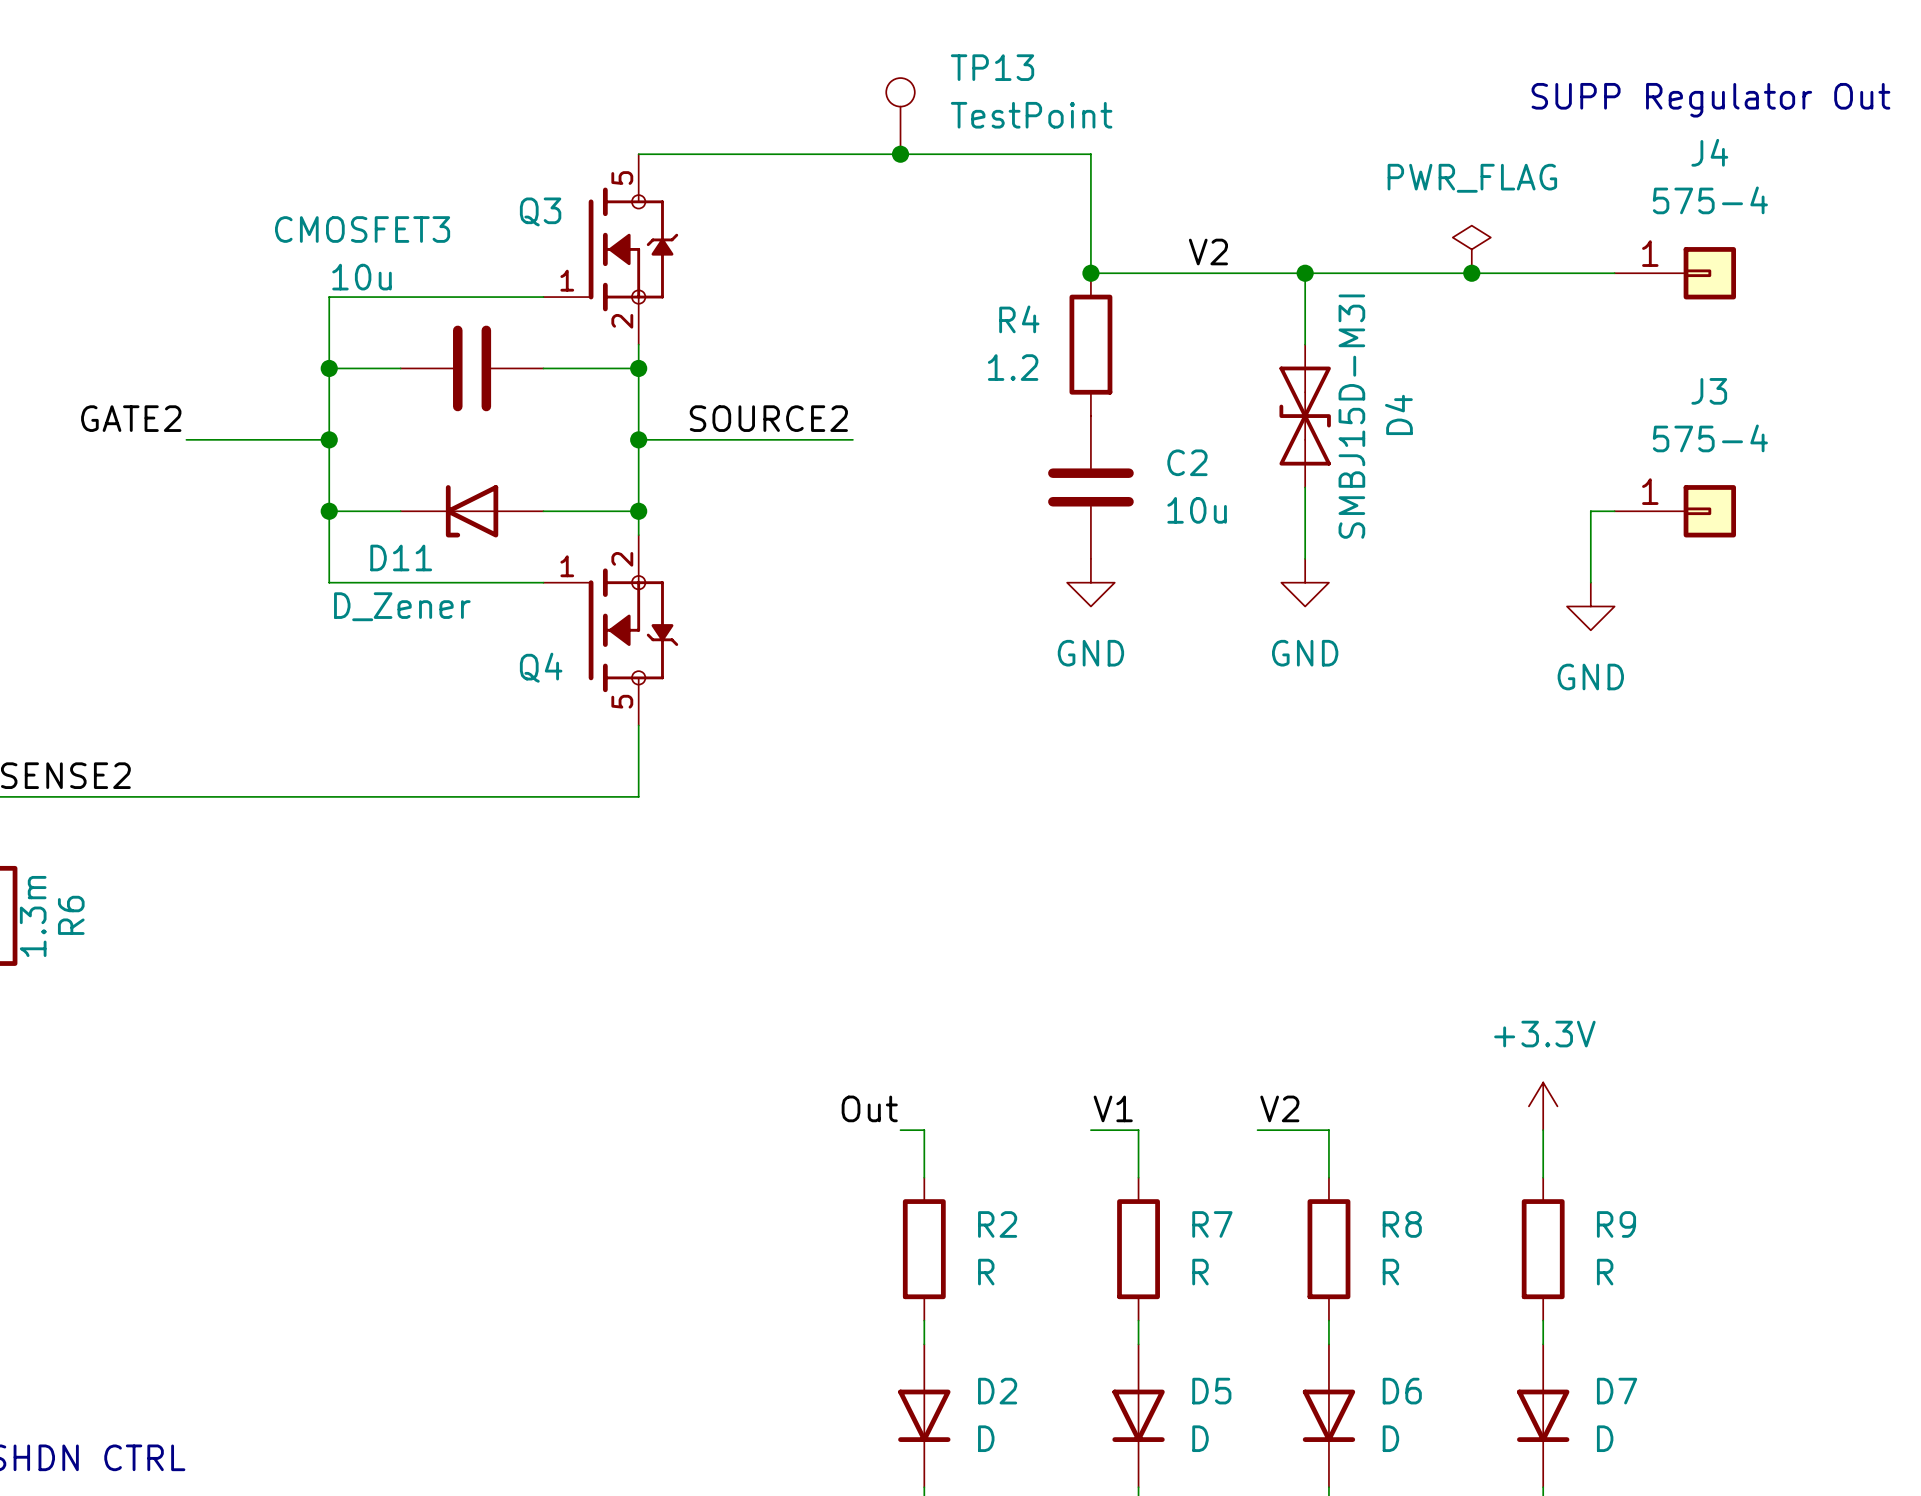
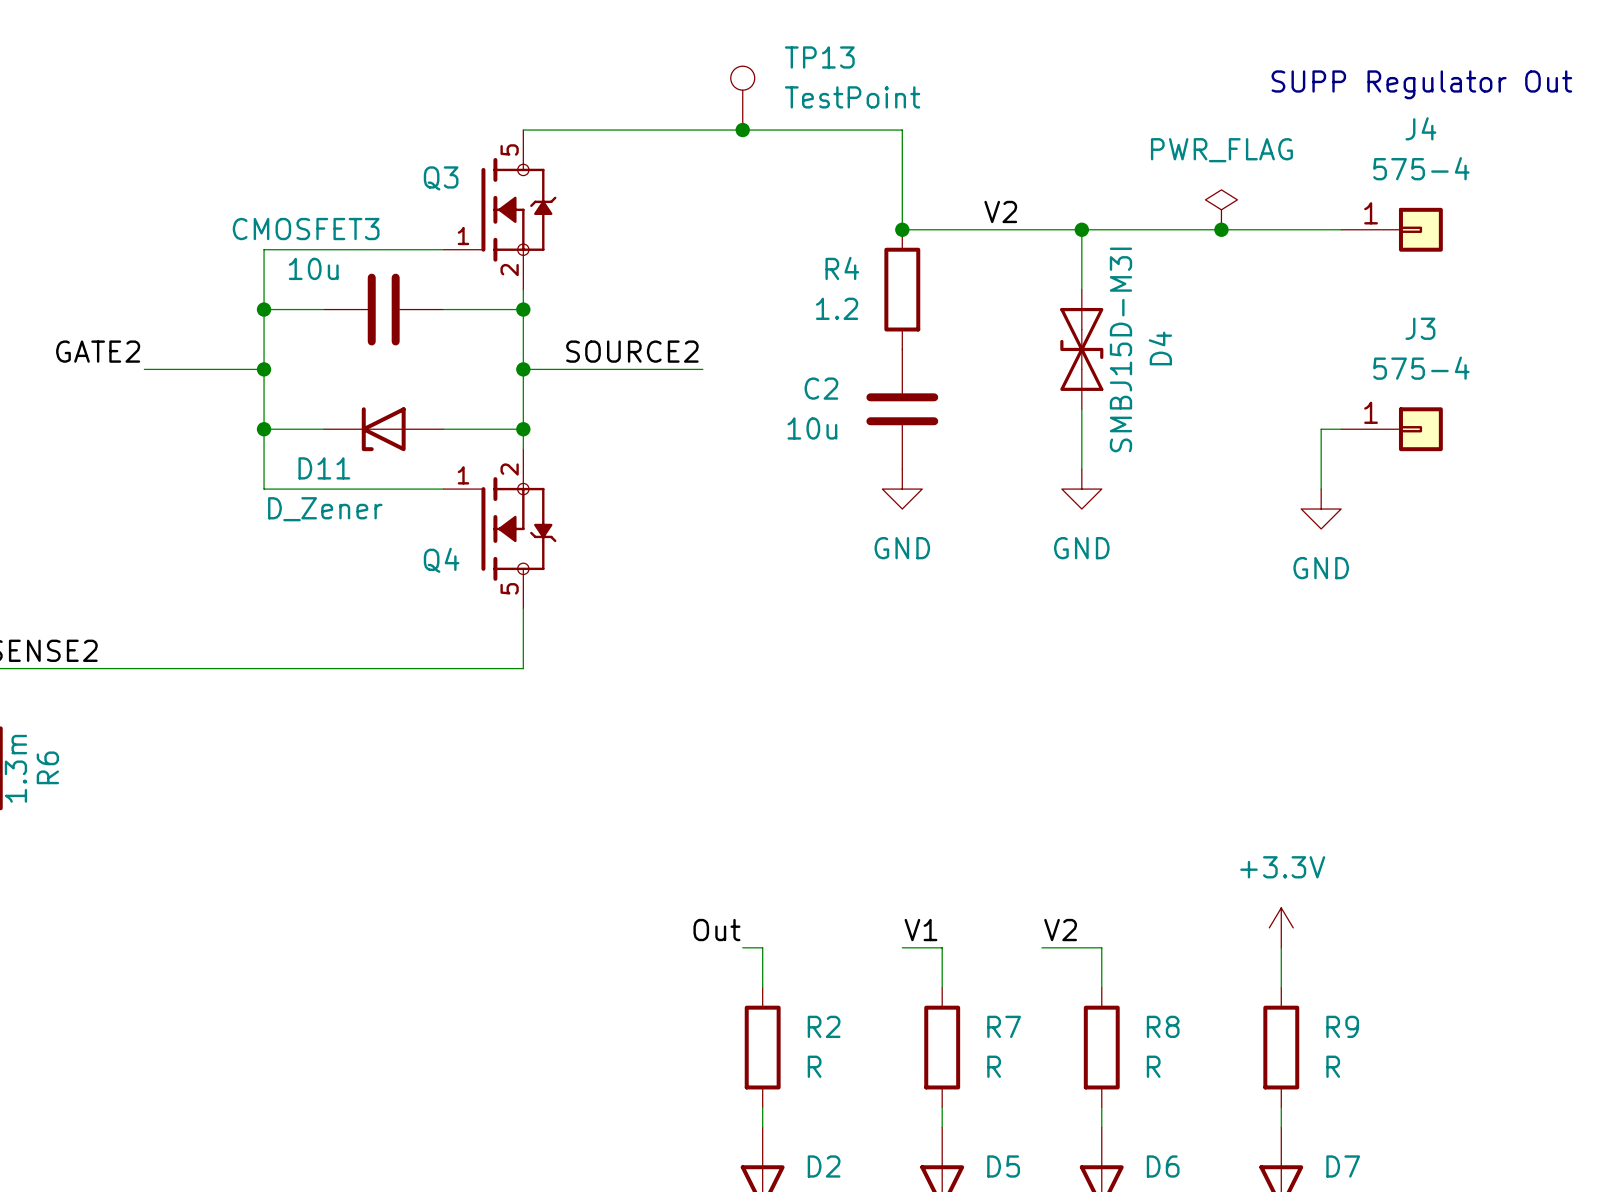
CMOSFET3 name position: CMOSFET3 (362, 229) -> CMOSFET3 (306, 229)
CMOSFET3 value position: 10u (361, 277) -> 10u (313, 268)
C2 name position: C2 (1187, 462) -> C2 (821, 388)
C2 value position: 10u (1197, 510) -> 10u (812, 428)

